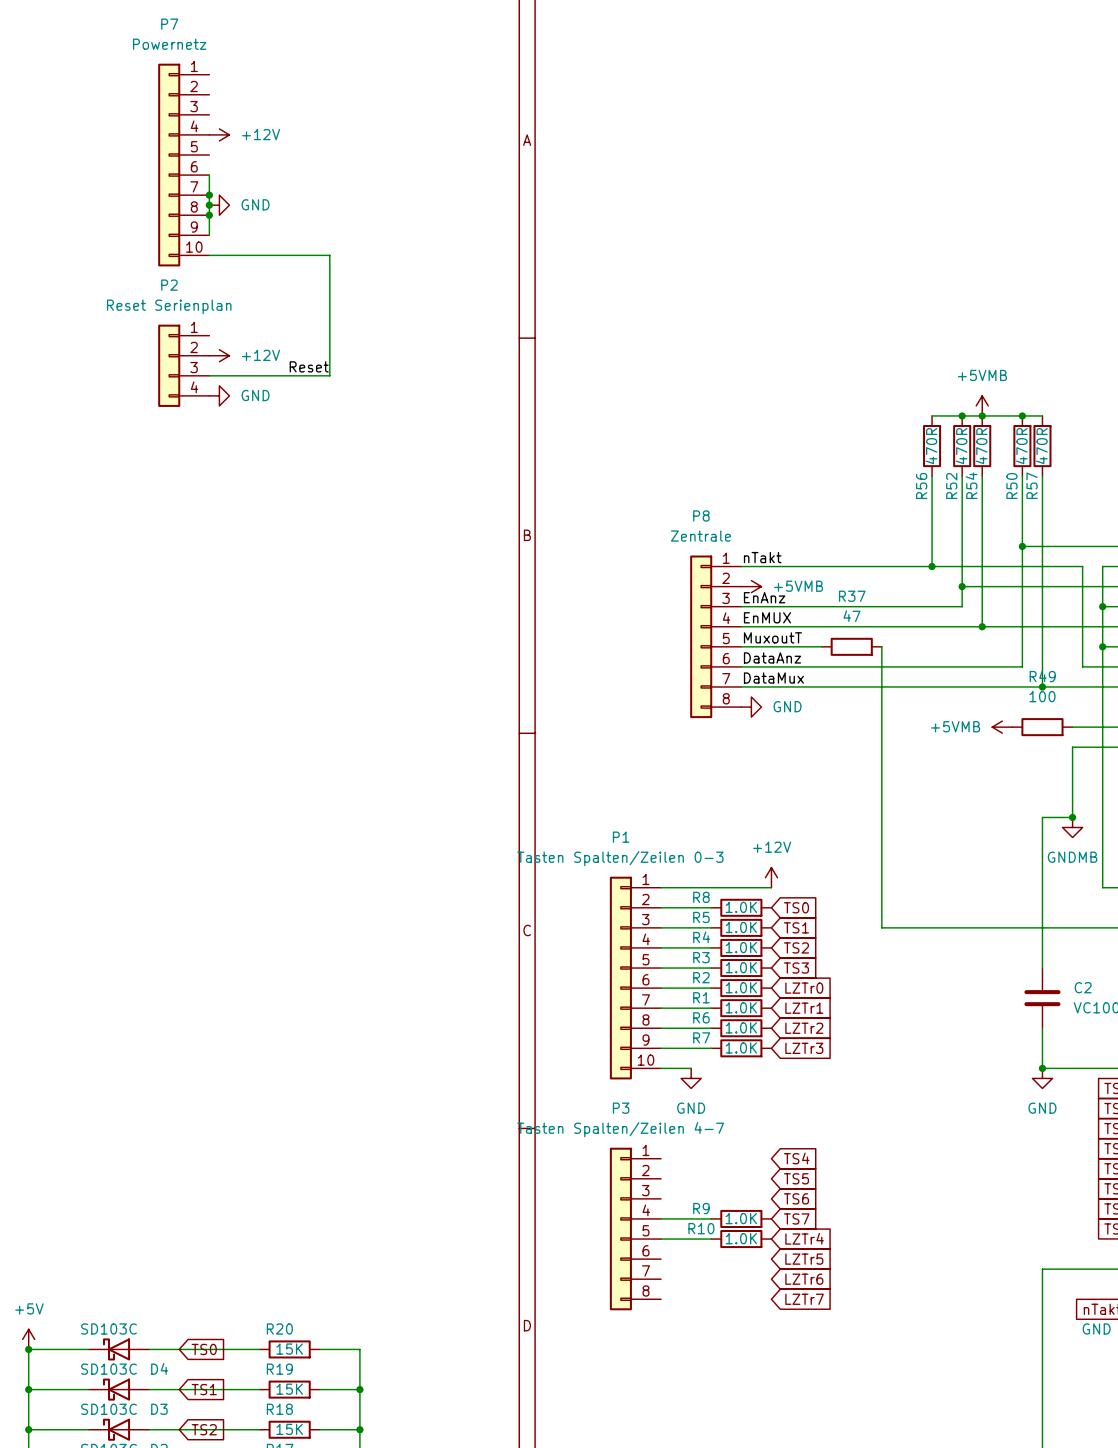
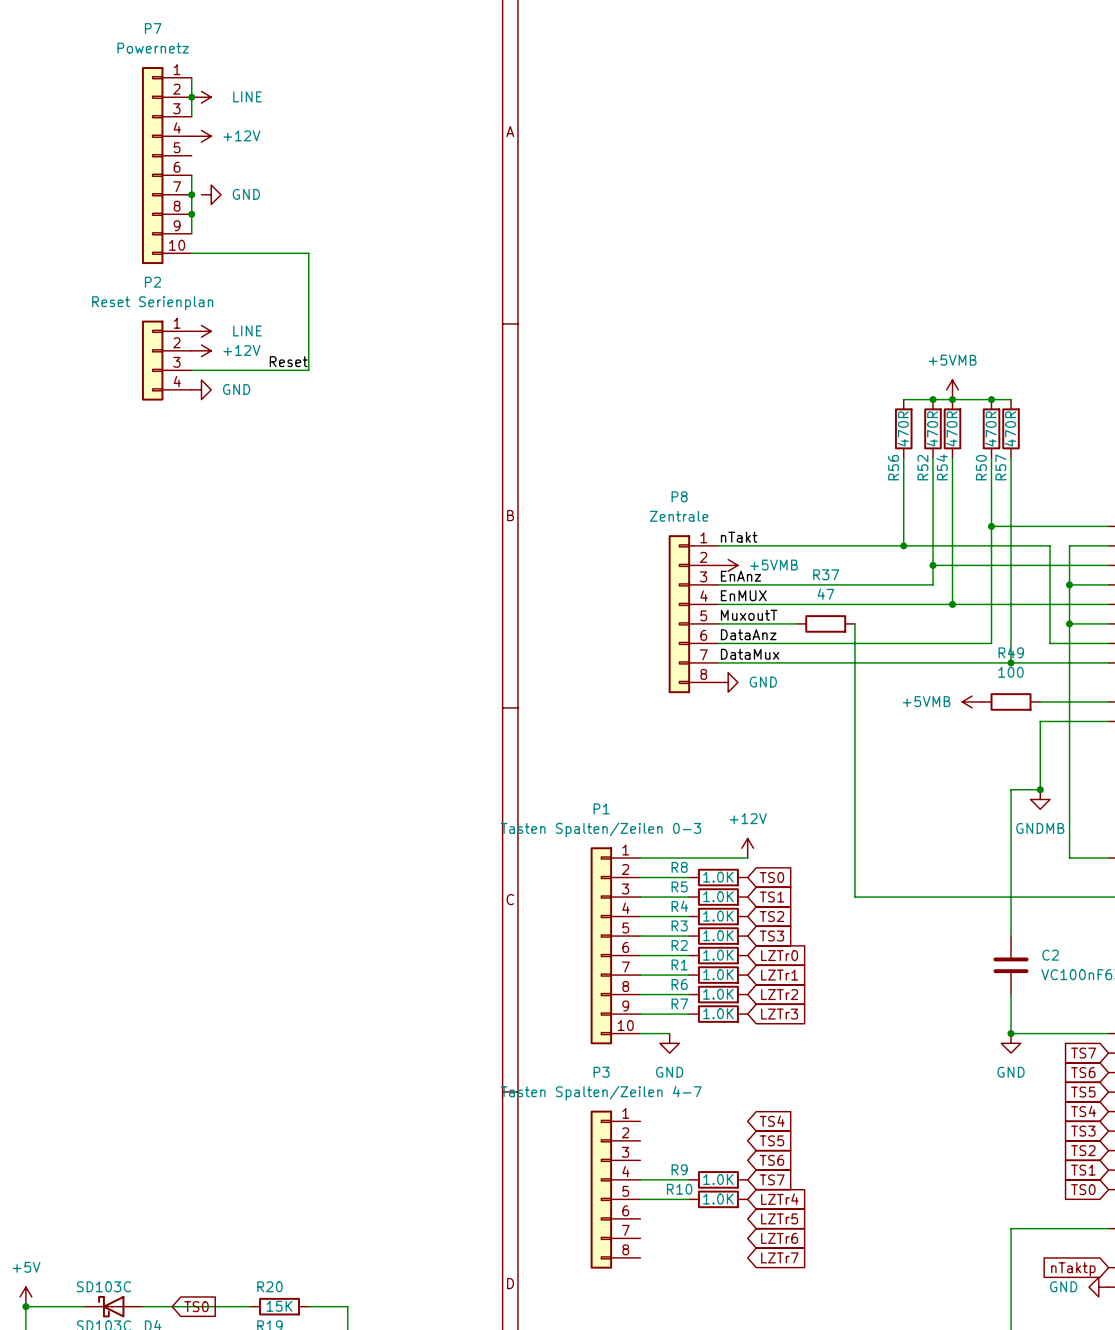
wire: none -> (191, 77) (191, 116)
junction: none -> (191, 97)
power symbol: none -> LINE (201, 97)
power symbol position: +12V (219, 134) -> +12V (201, 136)
P7 position: (183, 165) -> (166, 165)
wire: (209, 175) (209, 235) -> (191, 175) (191, 233)
junction: (209, 195) -> none
junction: none -> (191, 194)
junction: (209, 205) -> none
junction: (209, 215) -> none
junction: none -> (191, 214)
wire: (209, 255) (329, 255) (329, 375) (209, 375) -> (191, 253) (308, 253) (308, 370) (191, 370)
power symbol: none -> LINE (201, 331)
power symbol position: +12V (219, 355) -> +12V (201, 350)
P2 position: (183, 365) -> (166, 360)
label position: Reset (309, 366) -> Reset (288, 361)
power symbol position: GND (219, 395) -> GND (201, 389)

